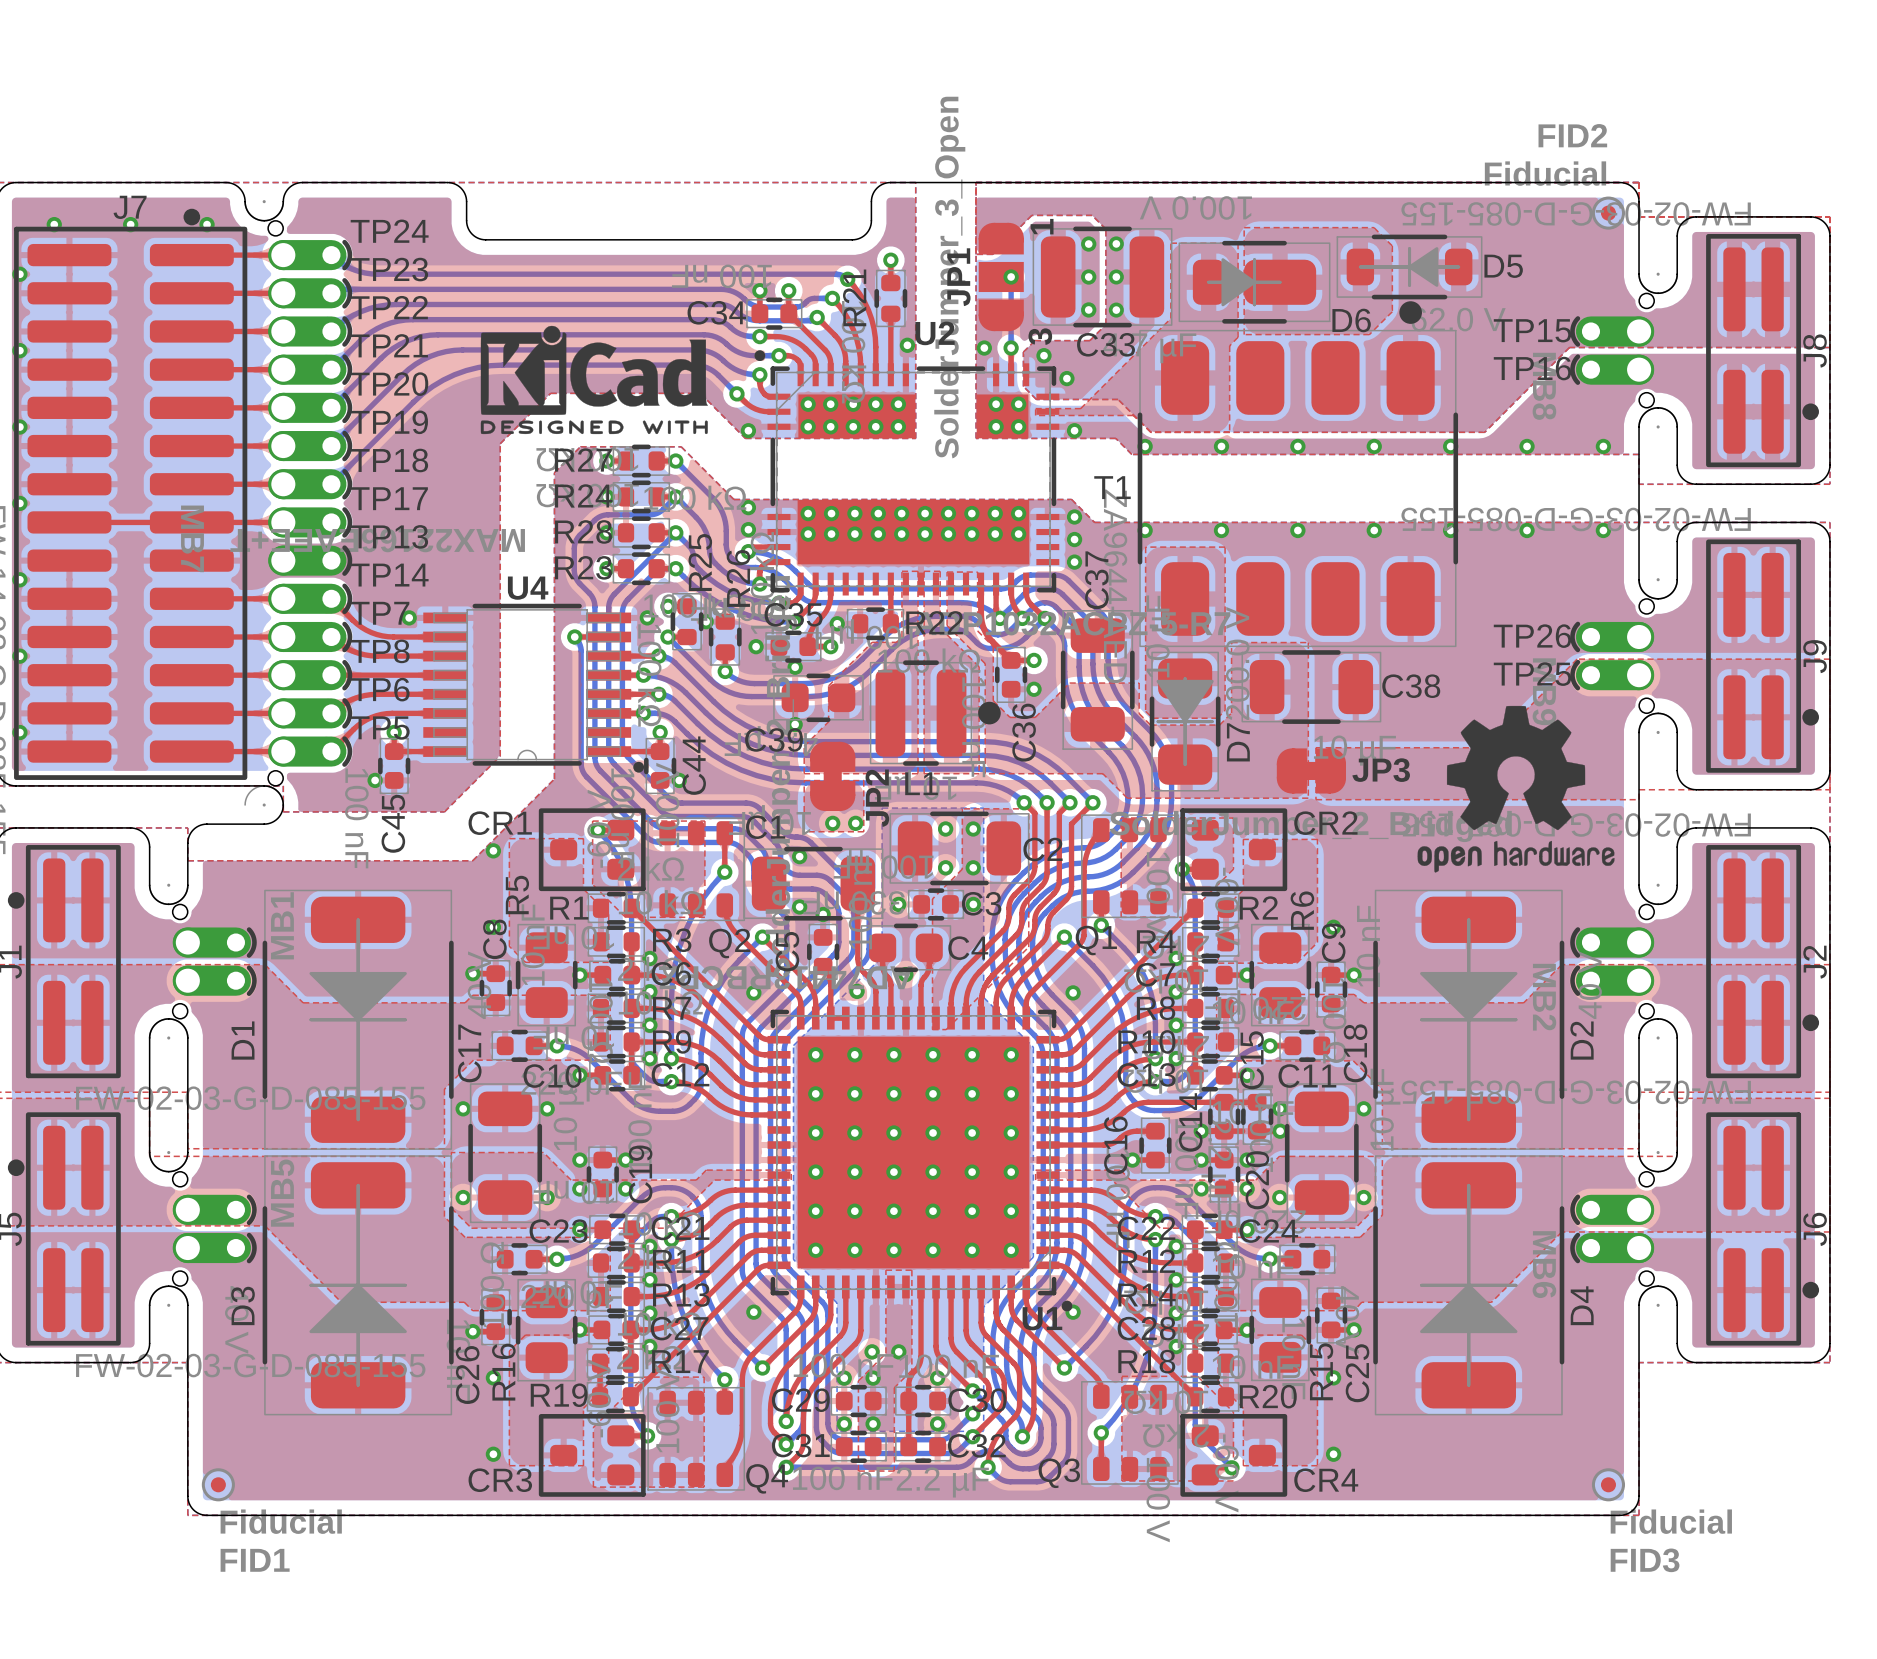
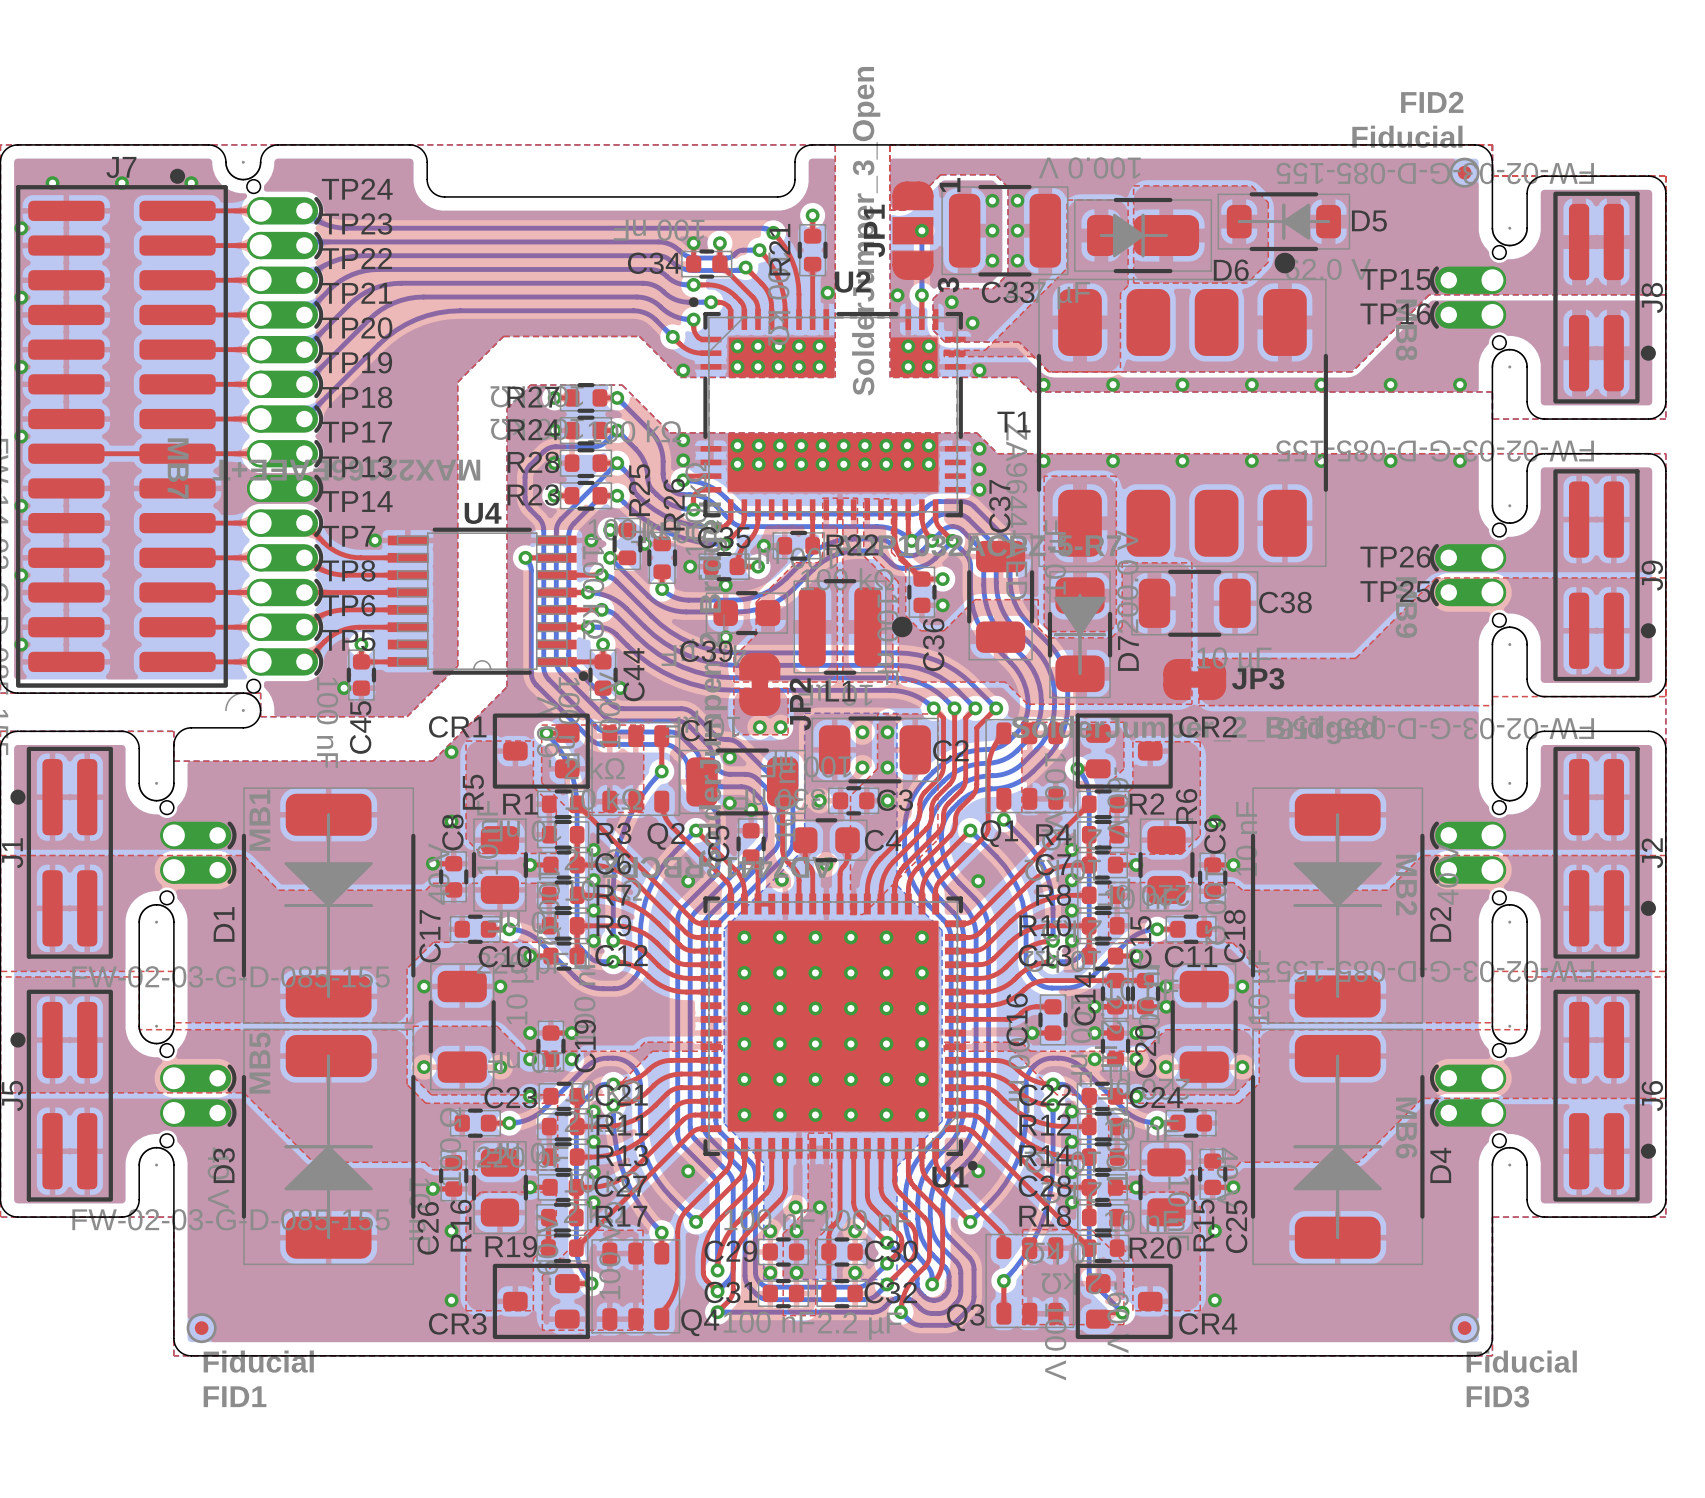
drawing: [480, 325, 708, 435] -> none
drawing: [1417, 705, 1615, 873] -> none

